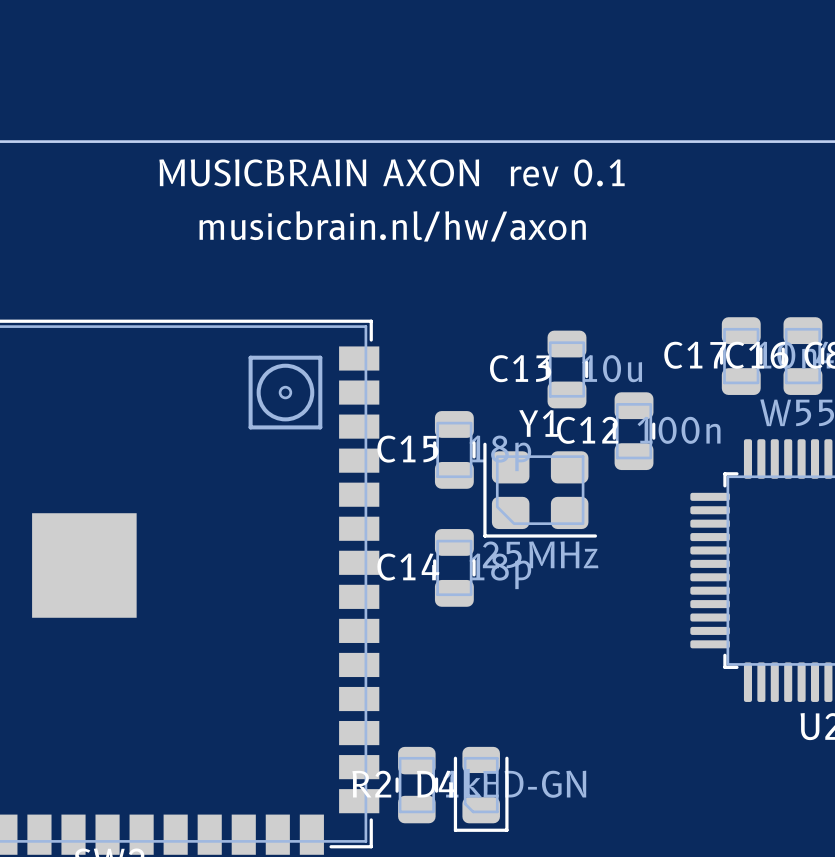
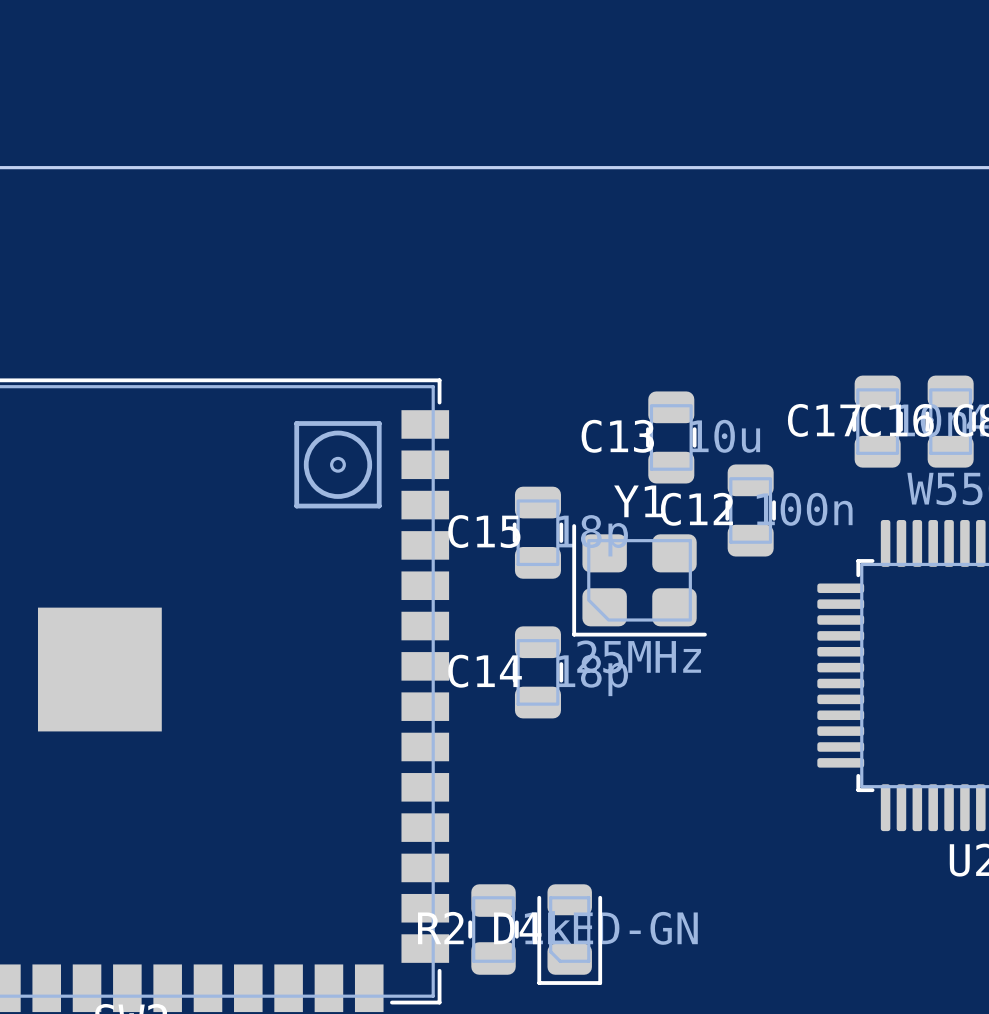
text: MUSICBRAIN AXON rev 0.1 (392, 172) -> none
text: musicbrain.nl/hw/axon (392, 226) -> none

